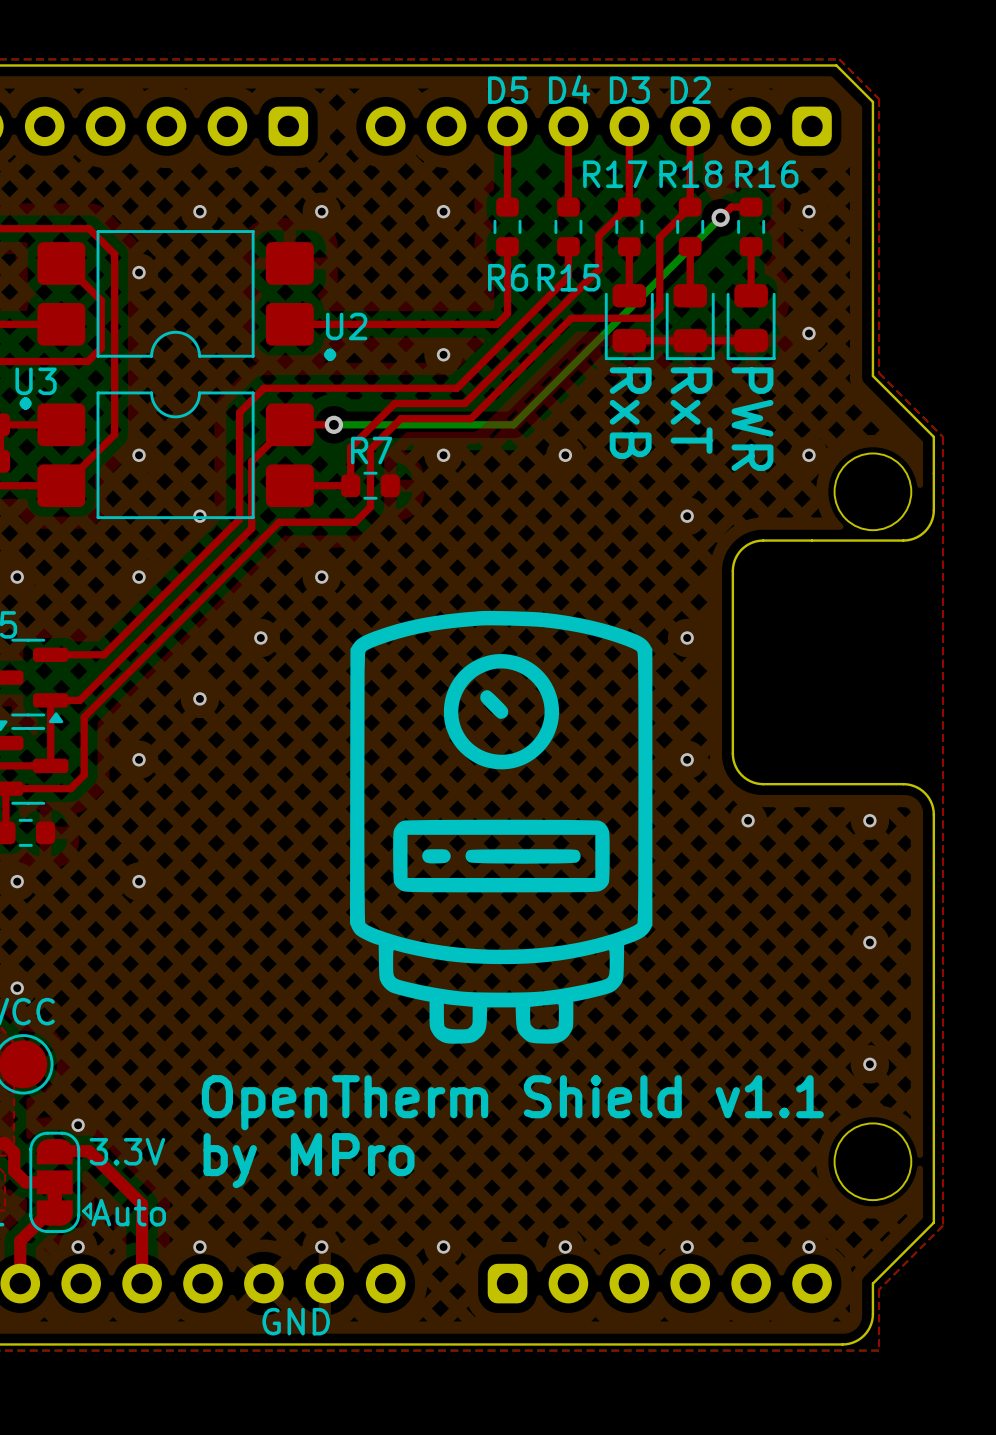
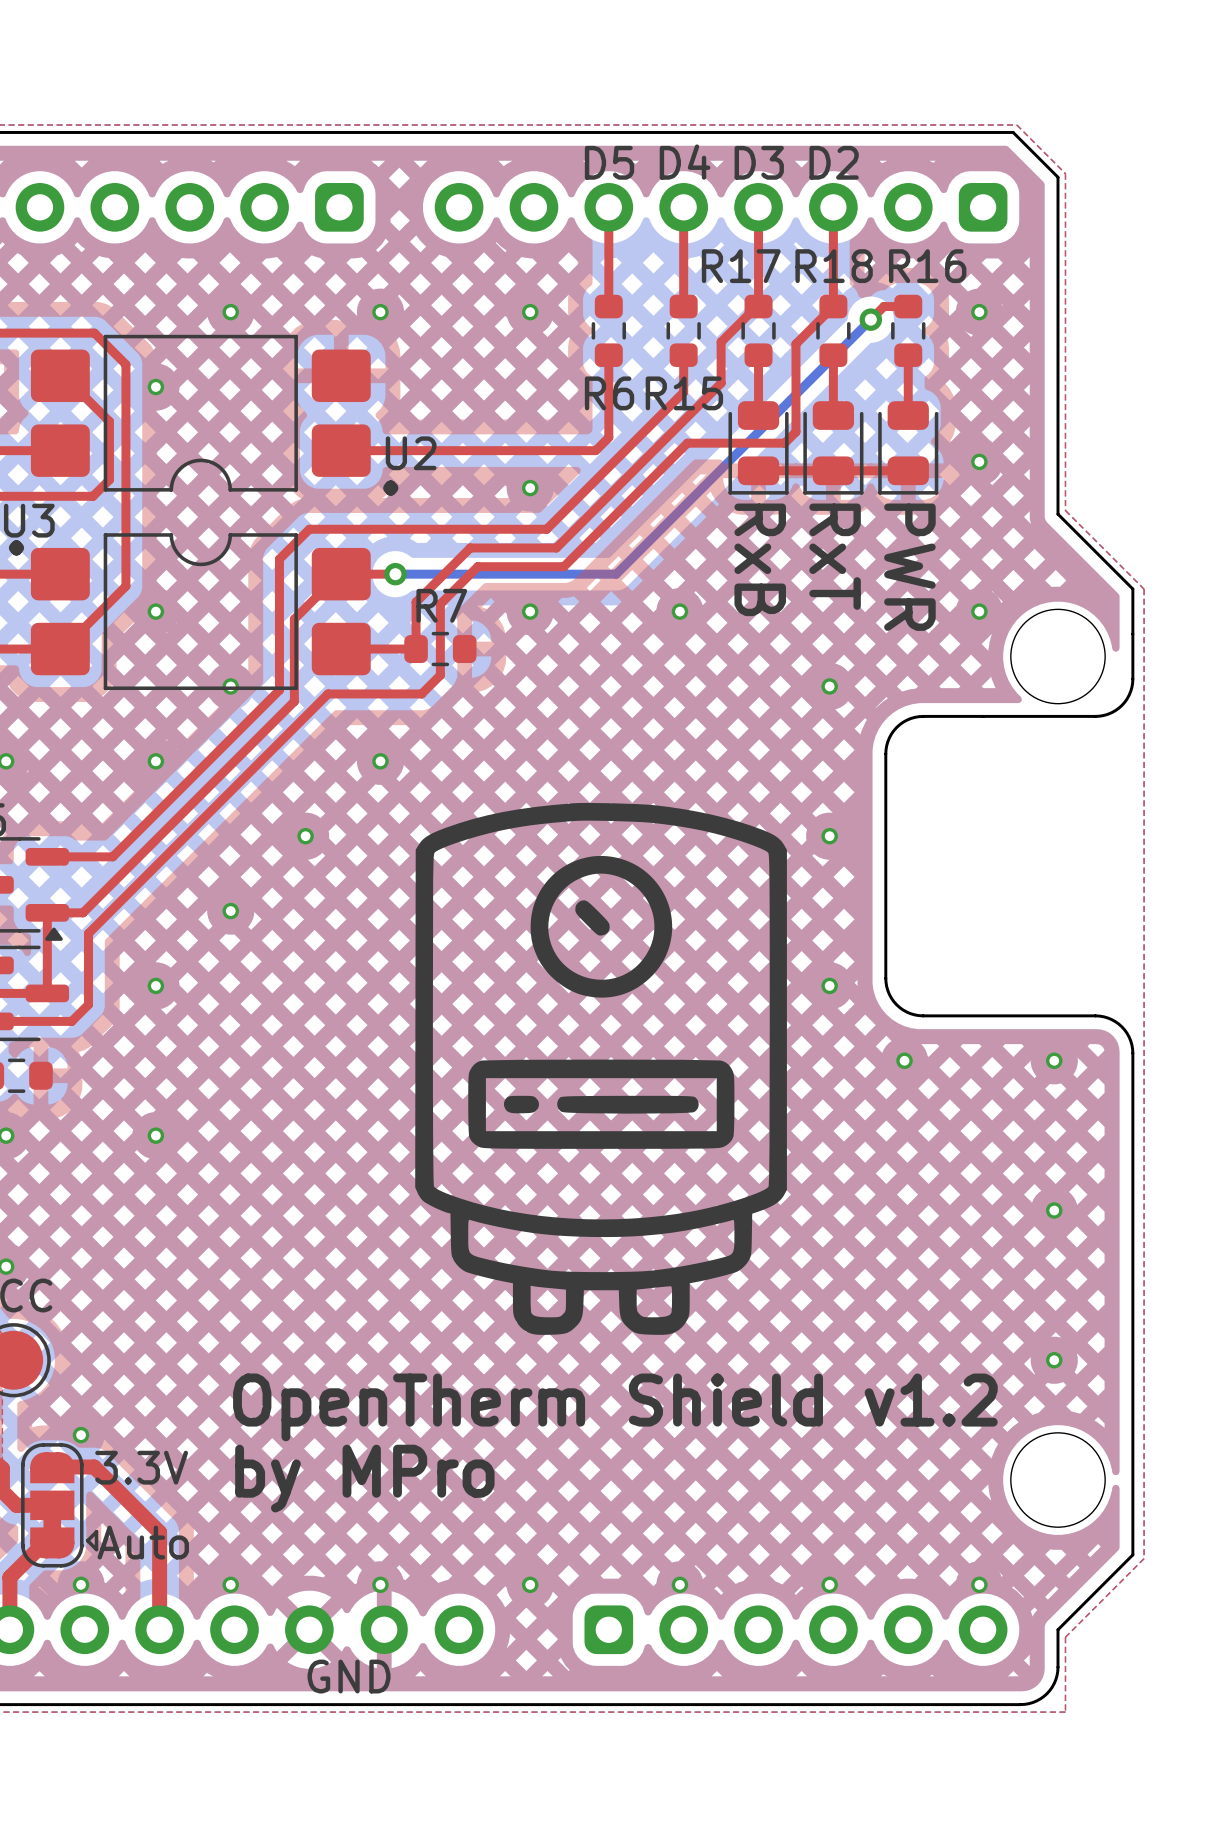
text: OpenTherm Shield v1.1 (512, 1102) -> OpenTherm Shield v1.2 (615, 1407)

